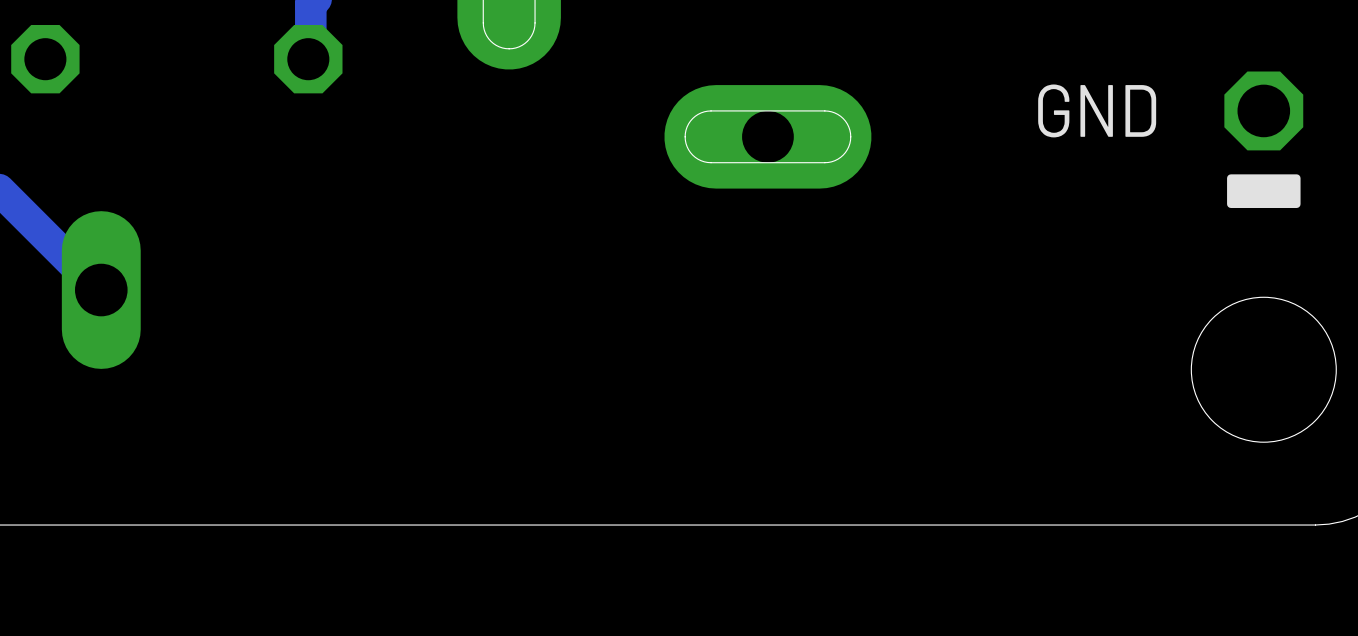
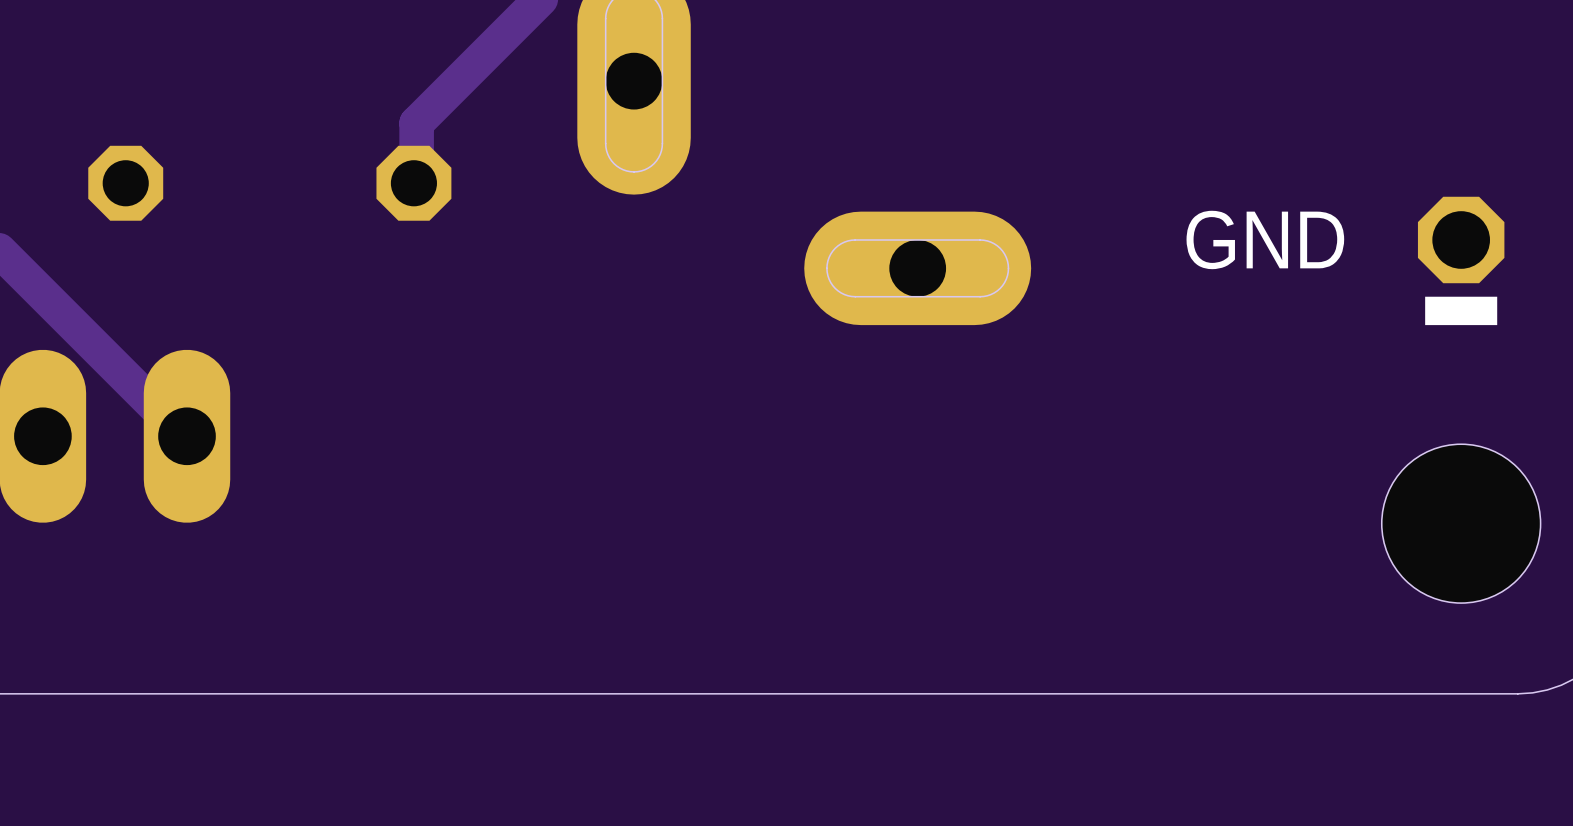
drawing shape: [1227, 174, 1301, 208] -> [1425, 296, 1498, 326]

